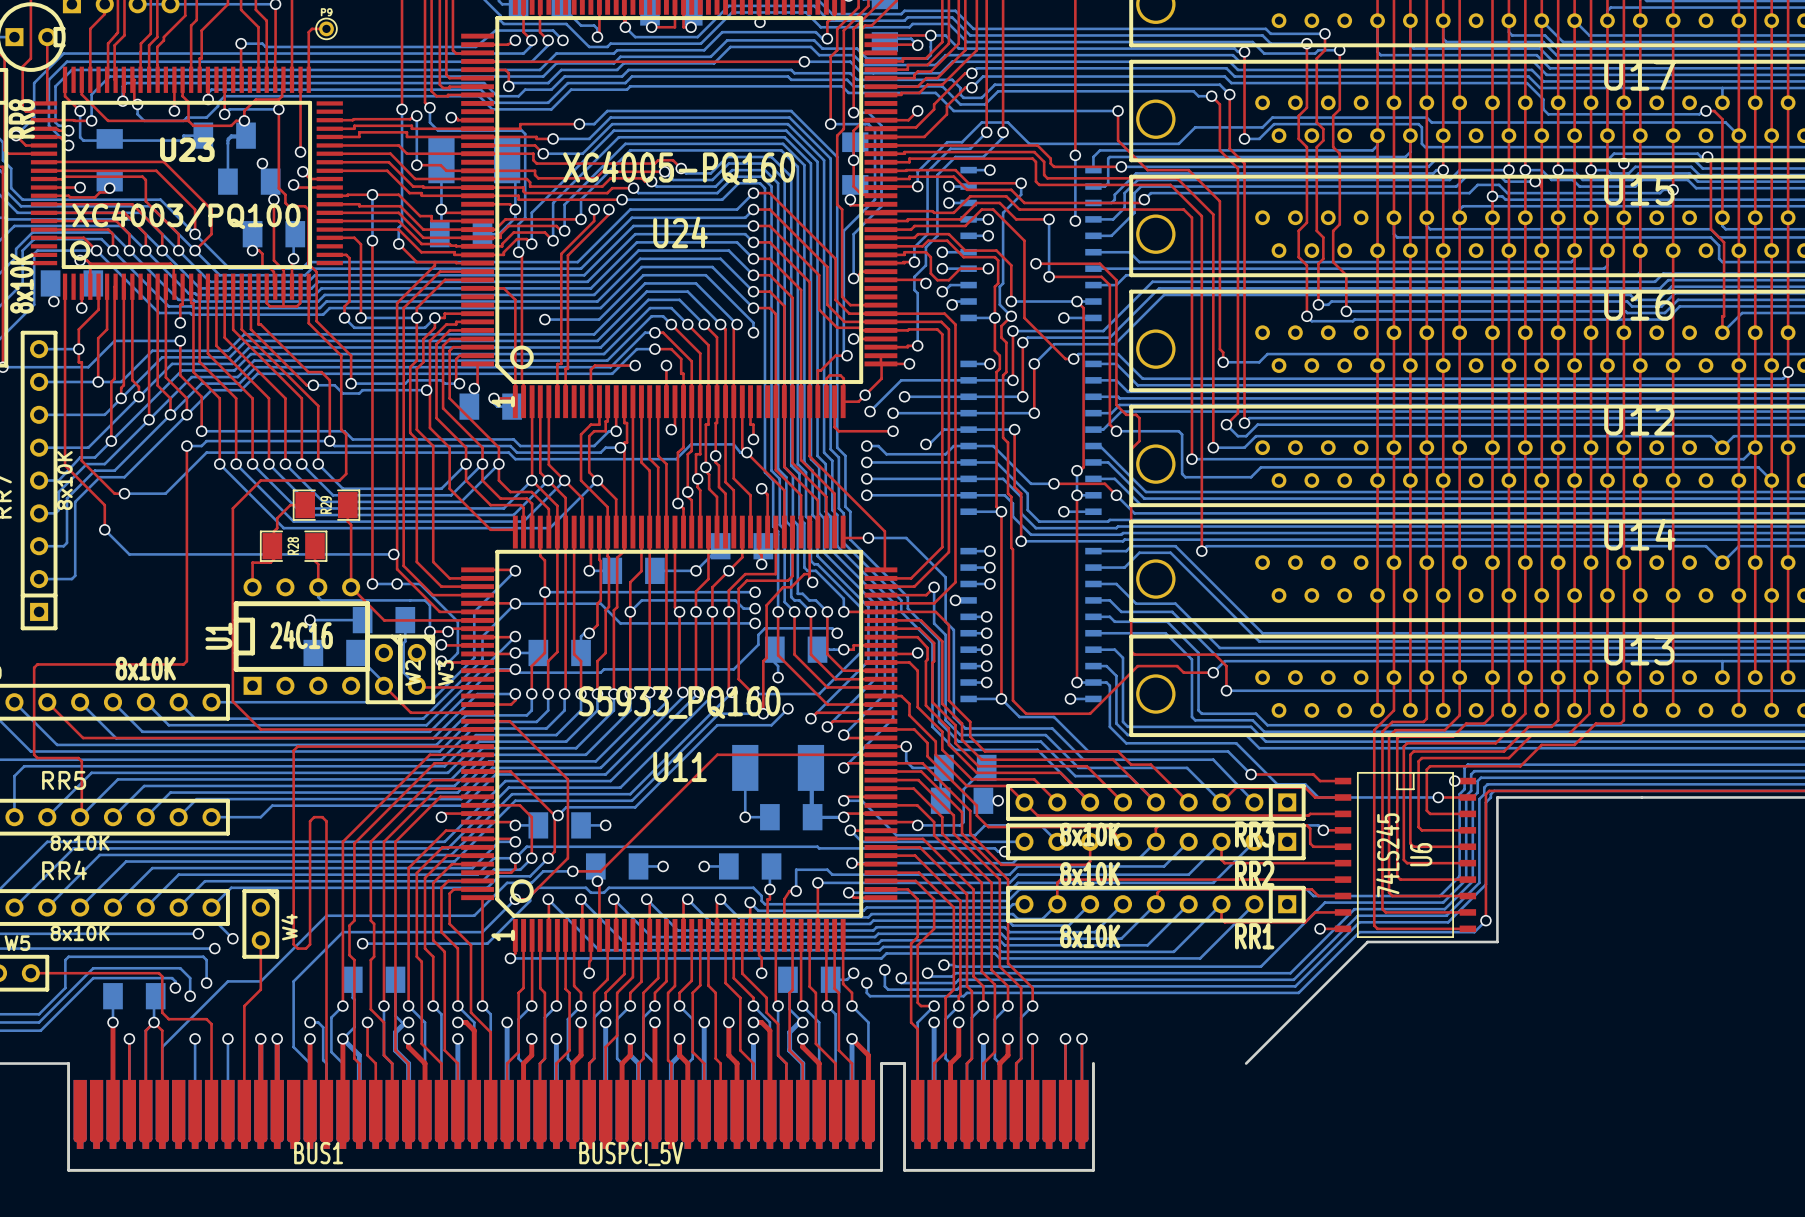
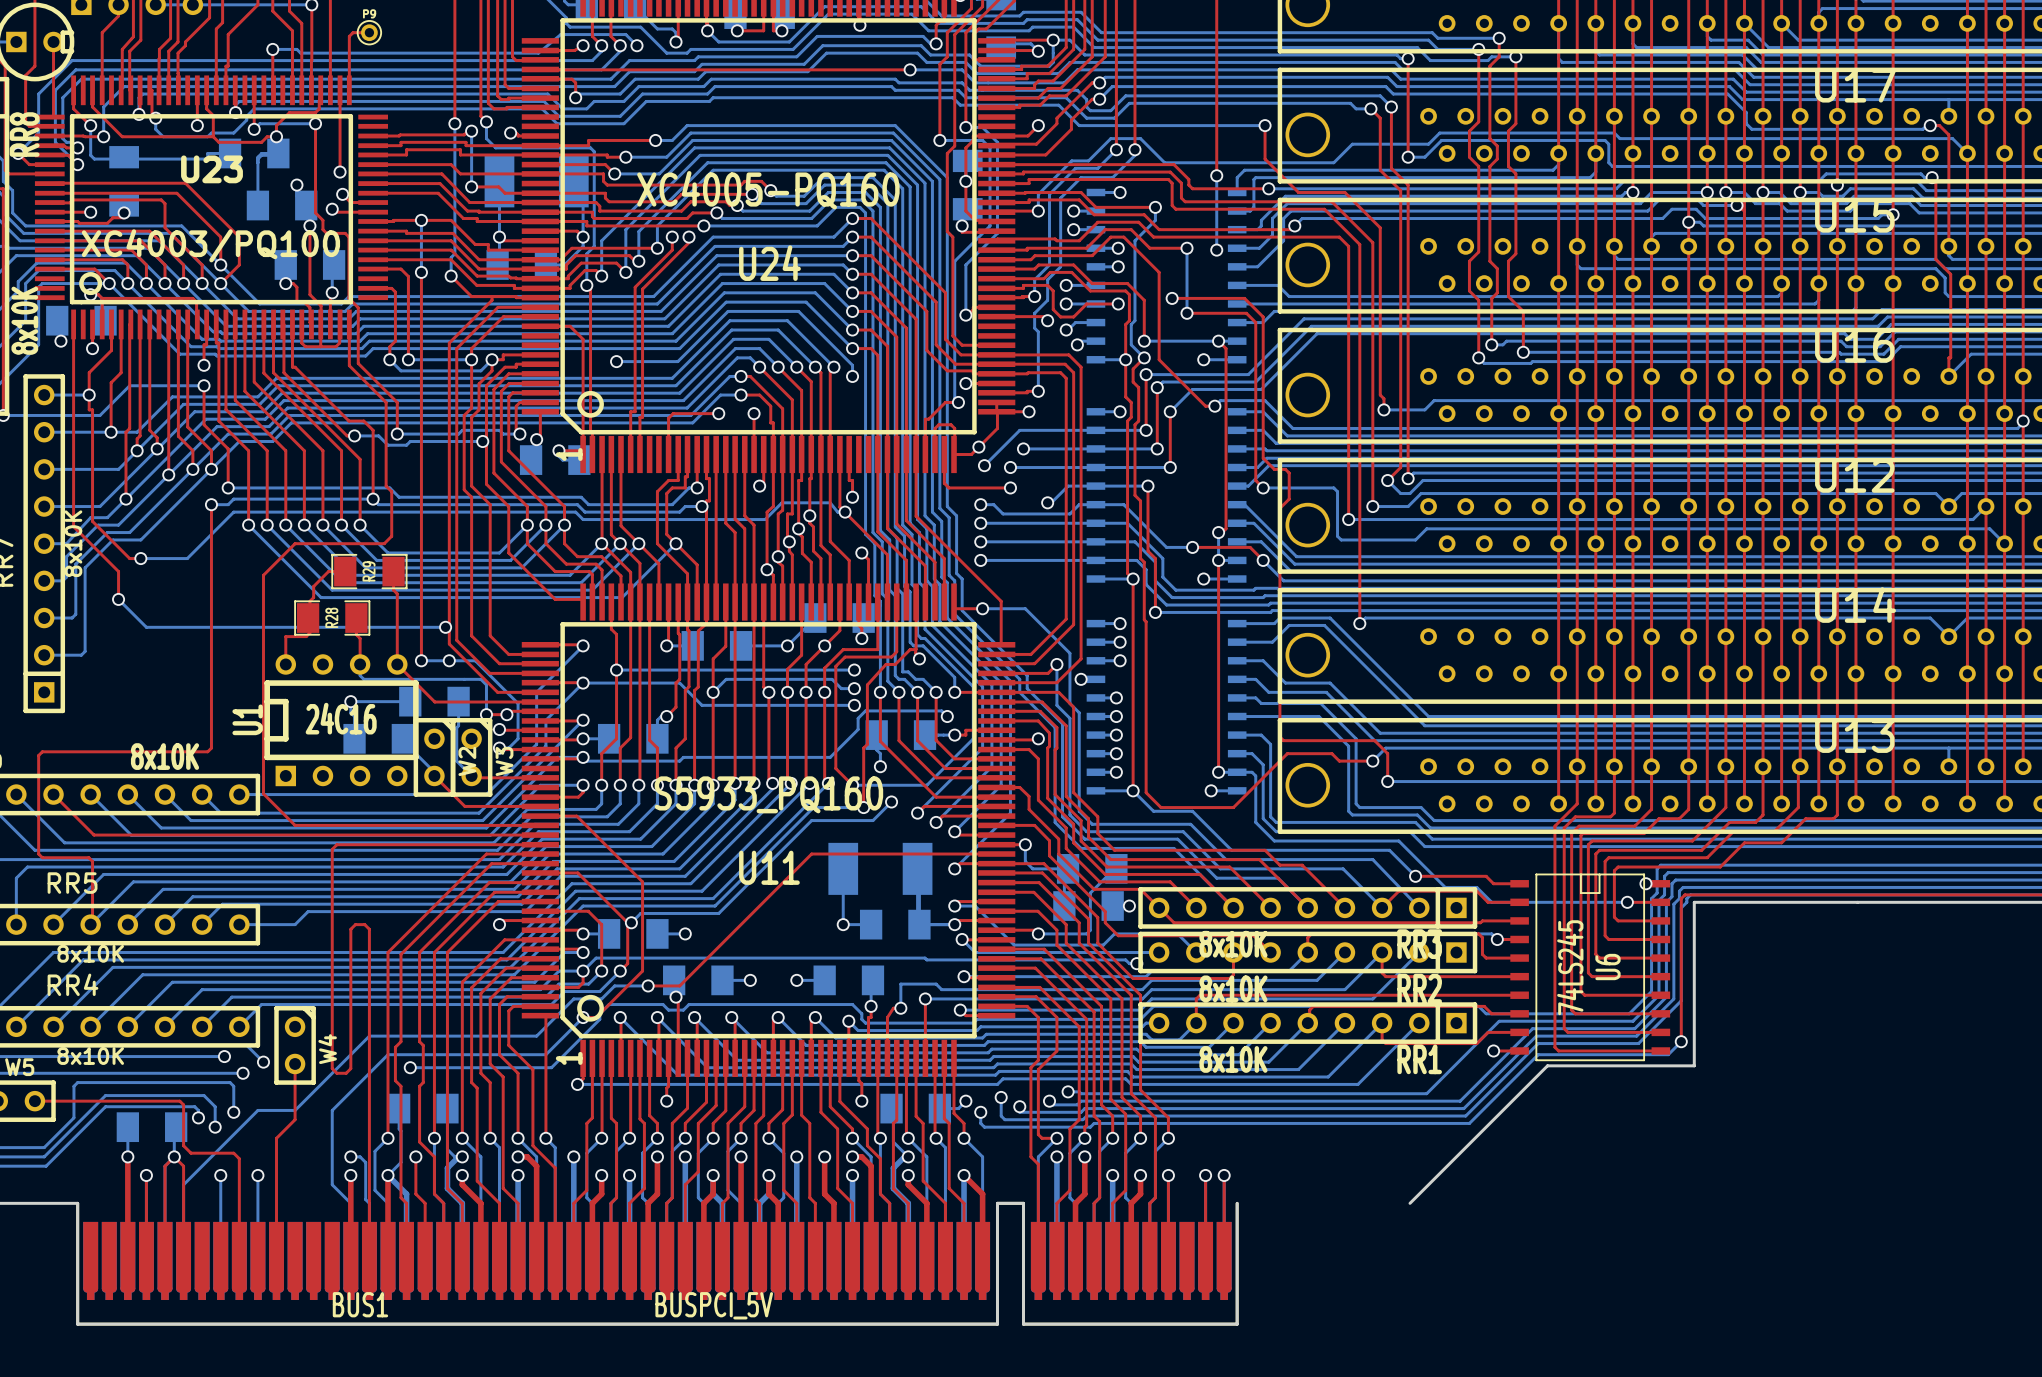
top track: (260, 1038) (260, 1109) -> none
via: (260, 1038) -> none
top track: (277, 1038) (277, 1109) -> none
via: (277, 1038) -> none

